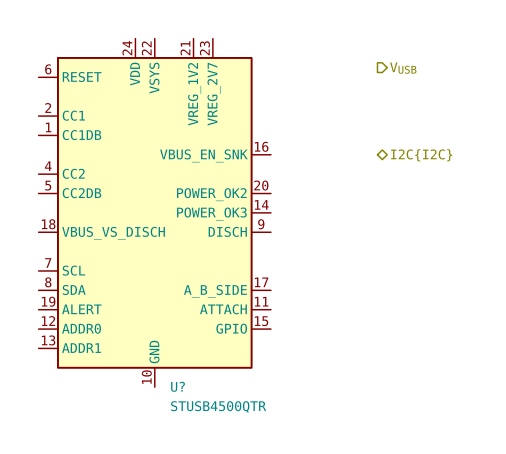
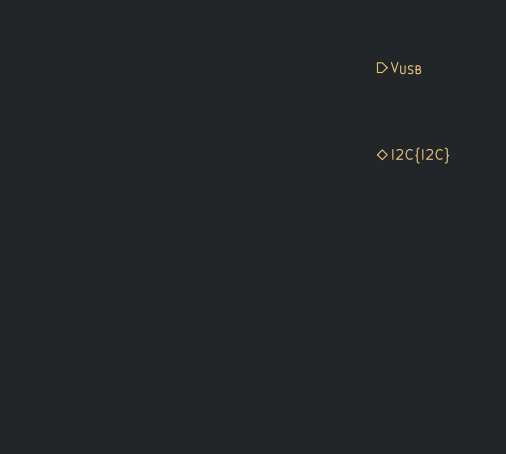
U?: STUSB4500QTR (154, 212) -> none

